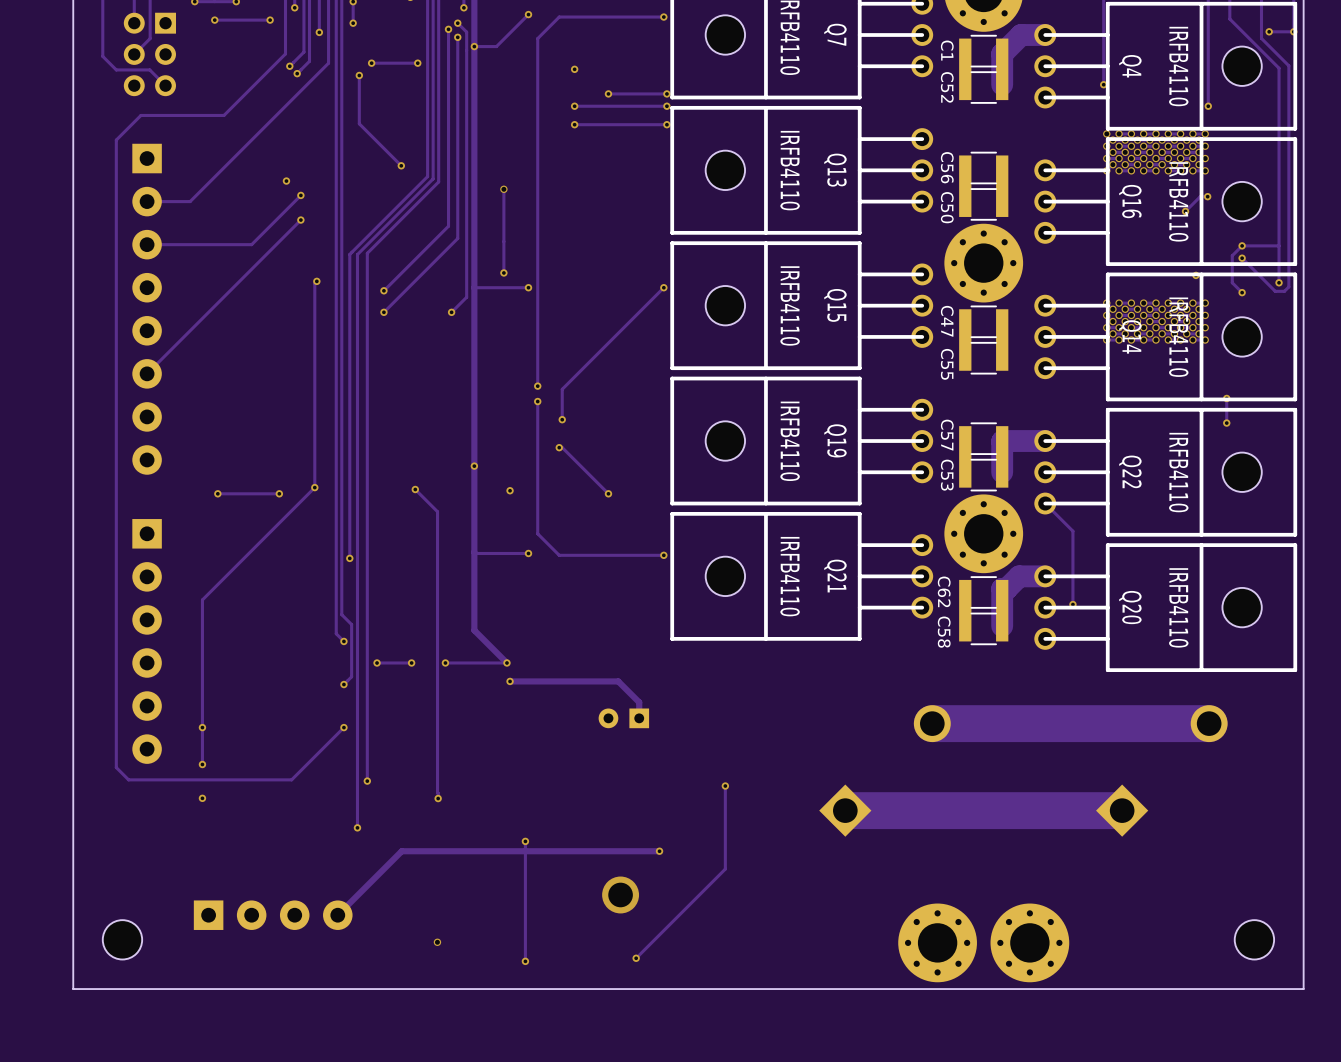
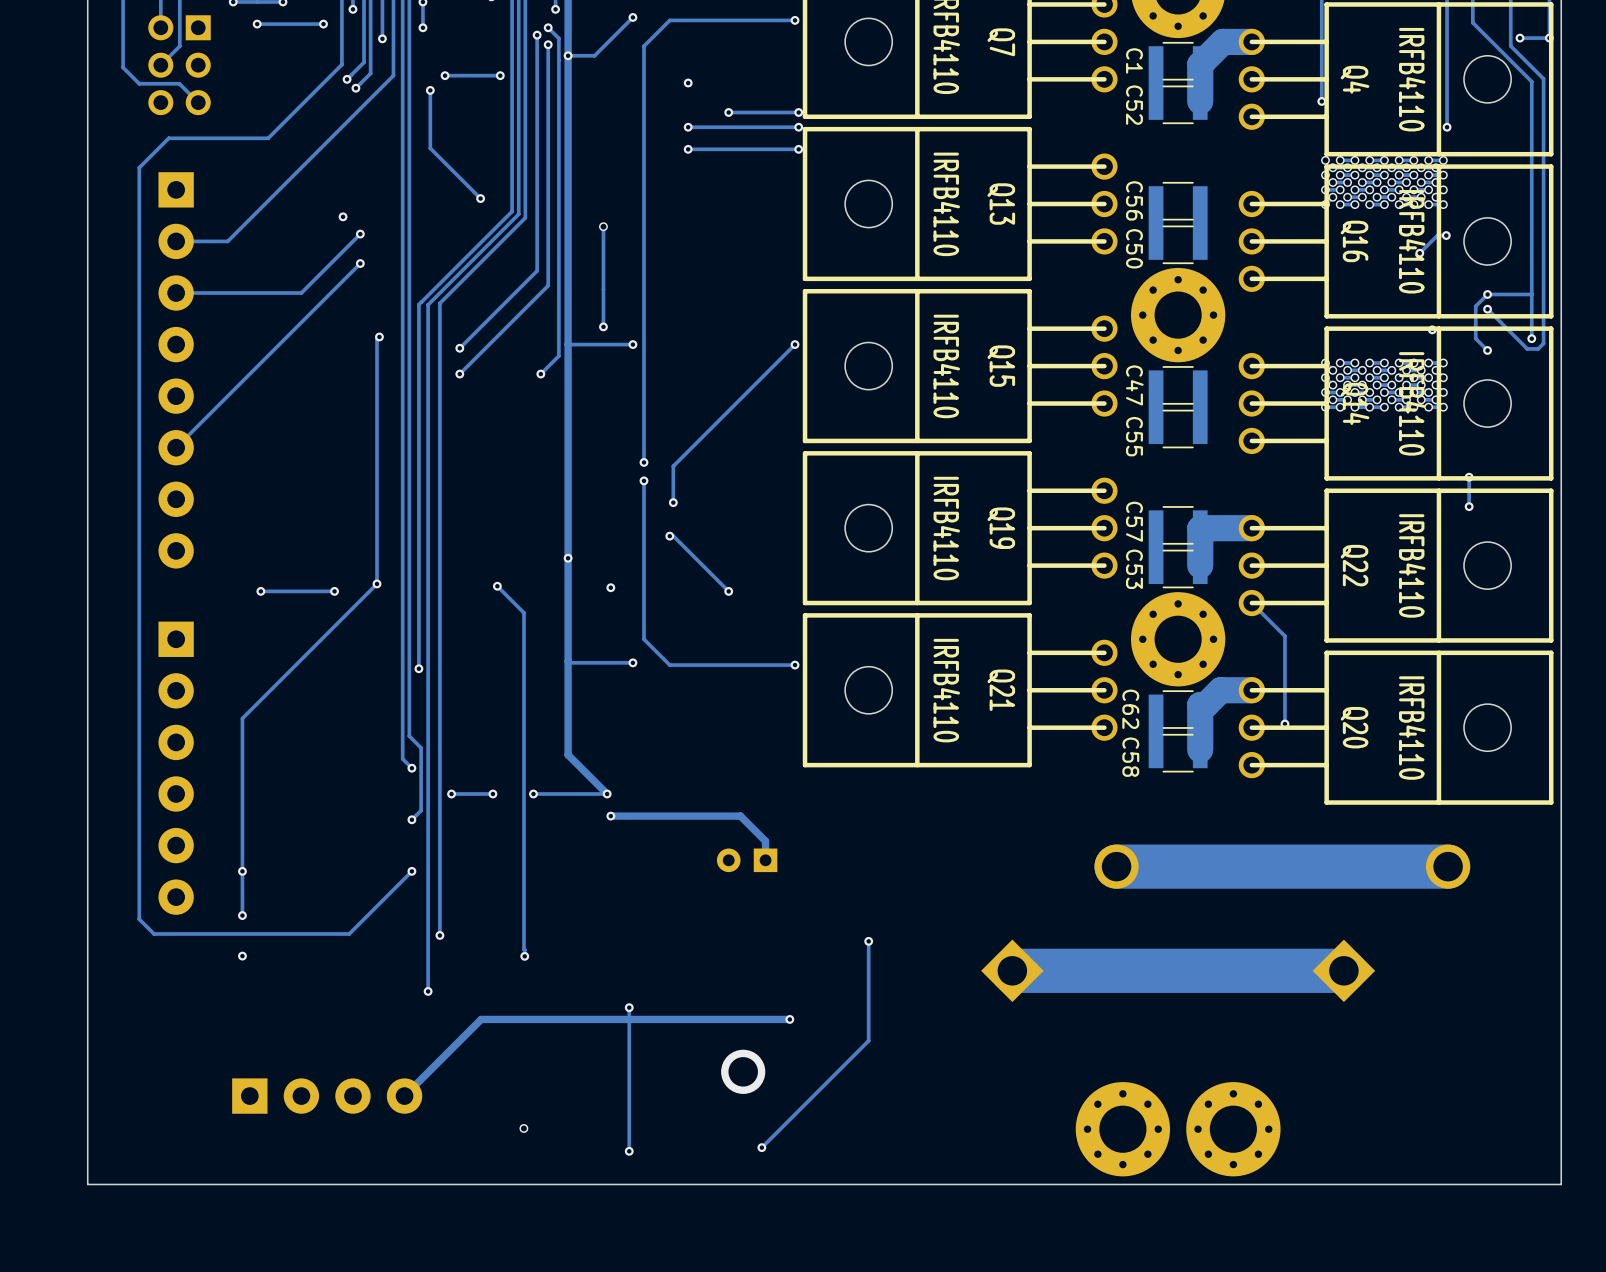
part: (122, 939) -> none
part: (1254, 939) -> none

